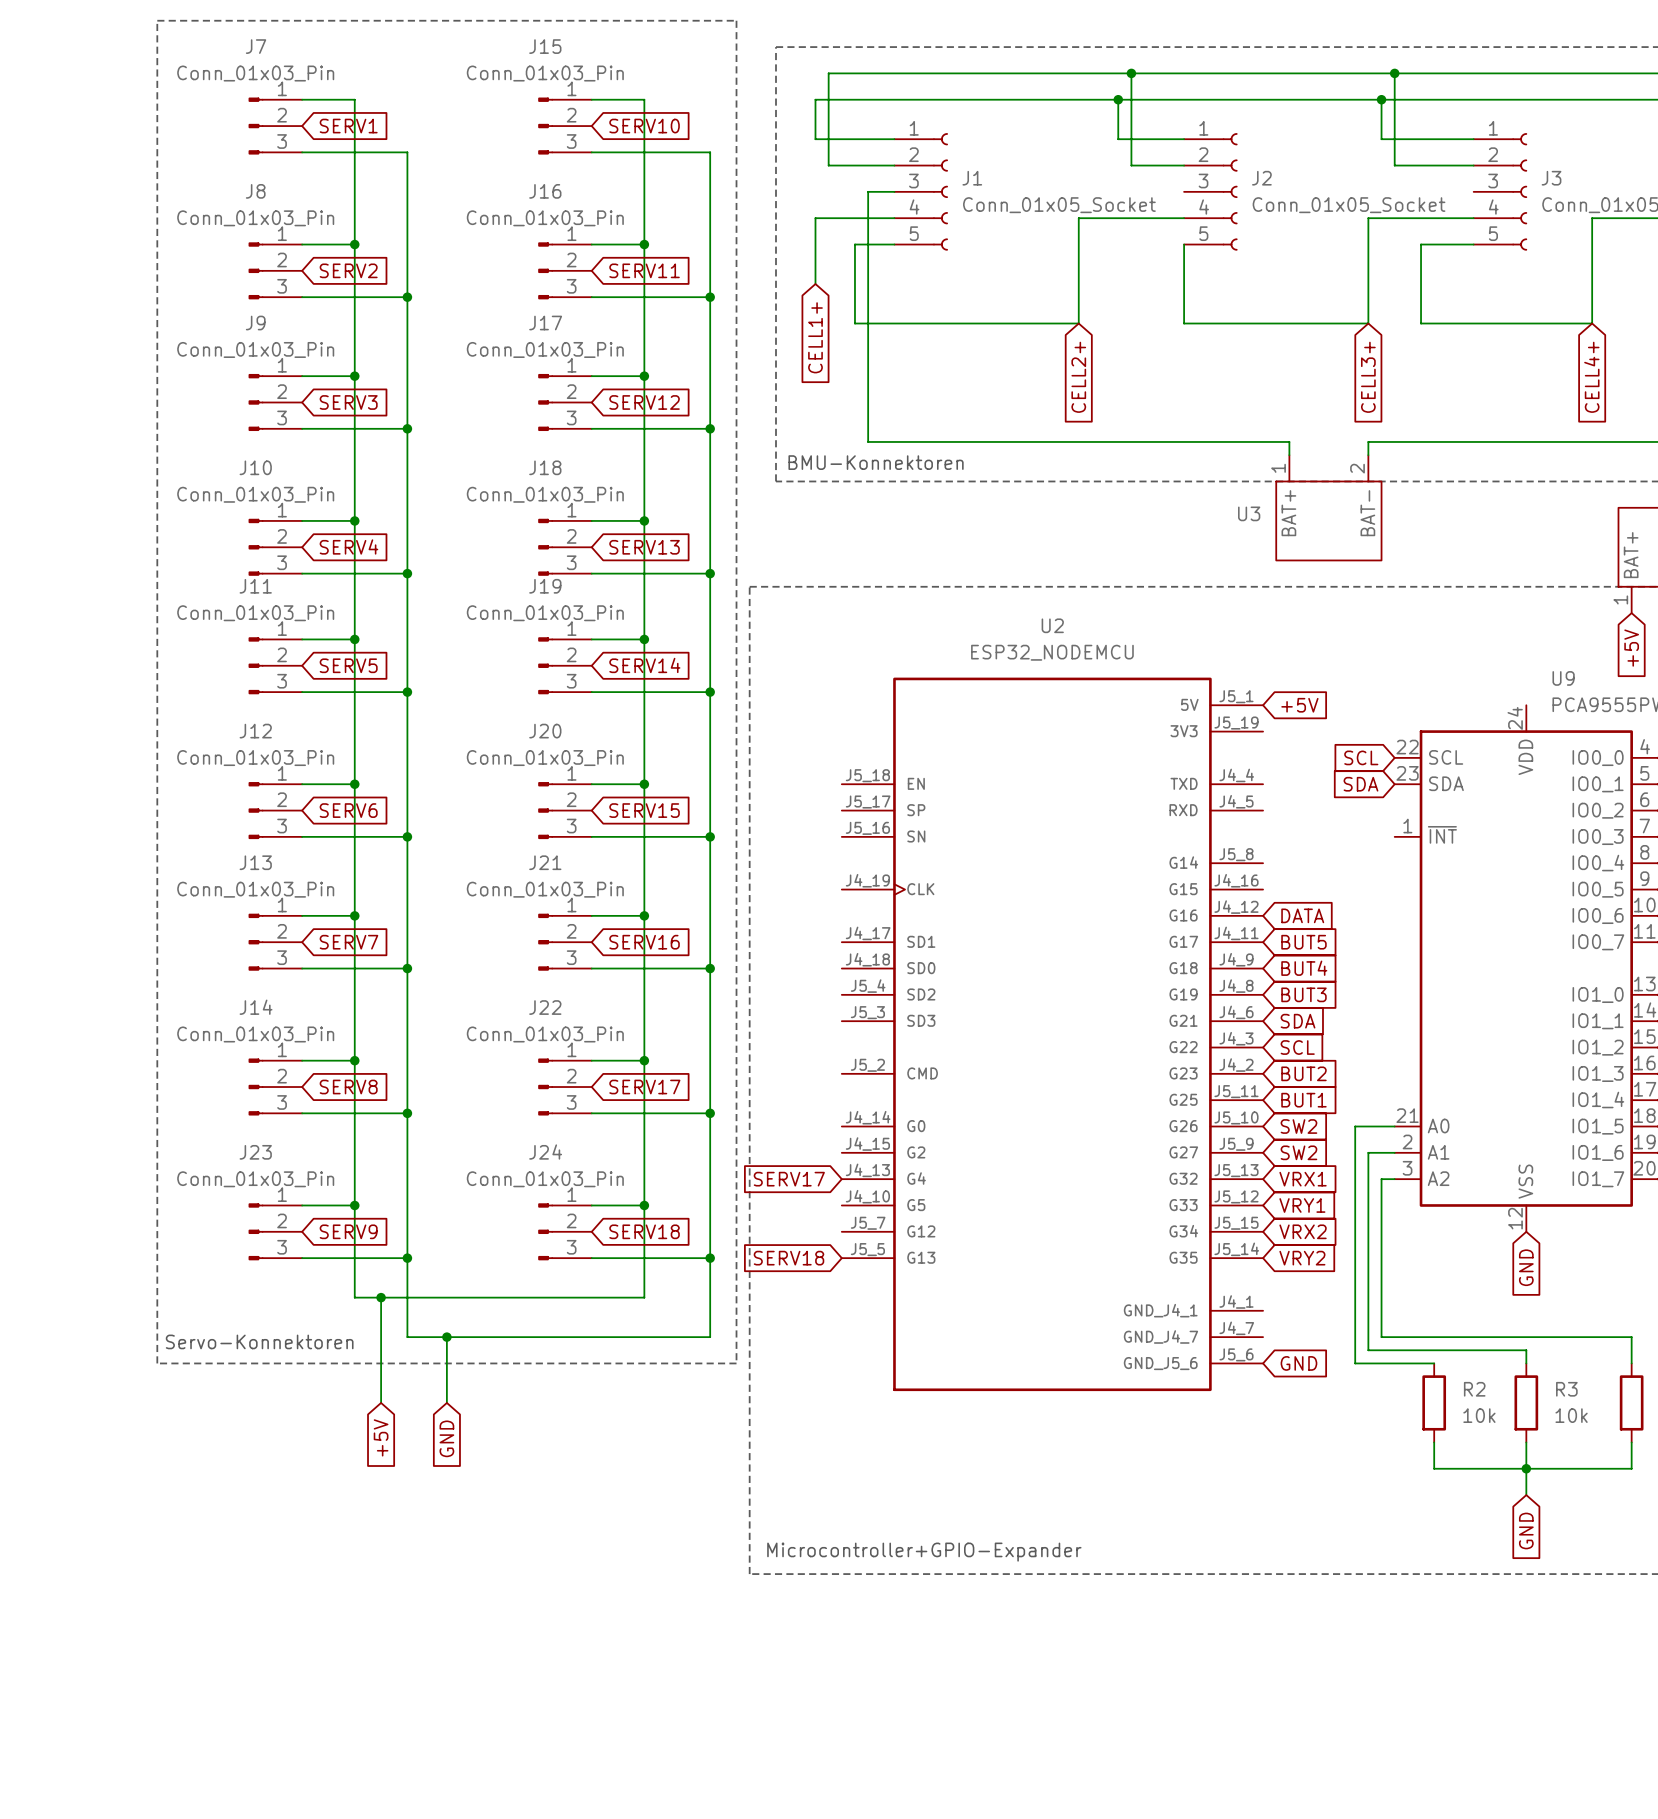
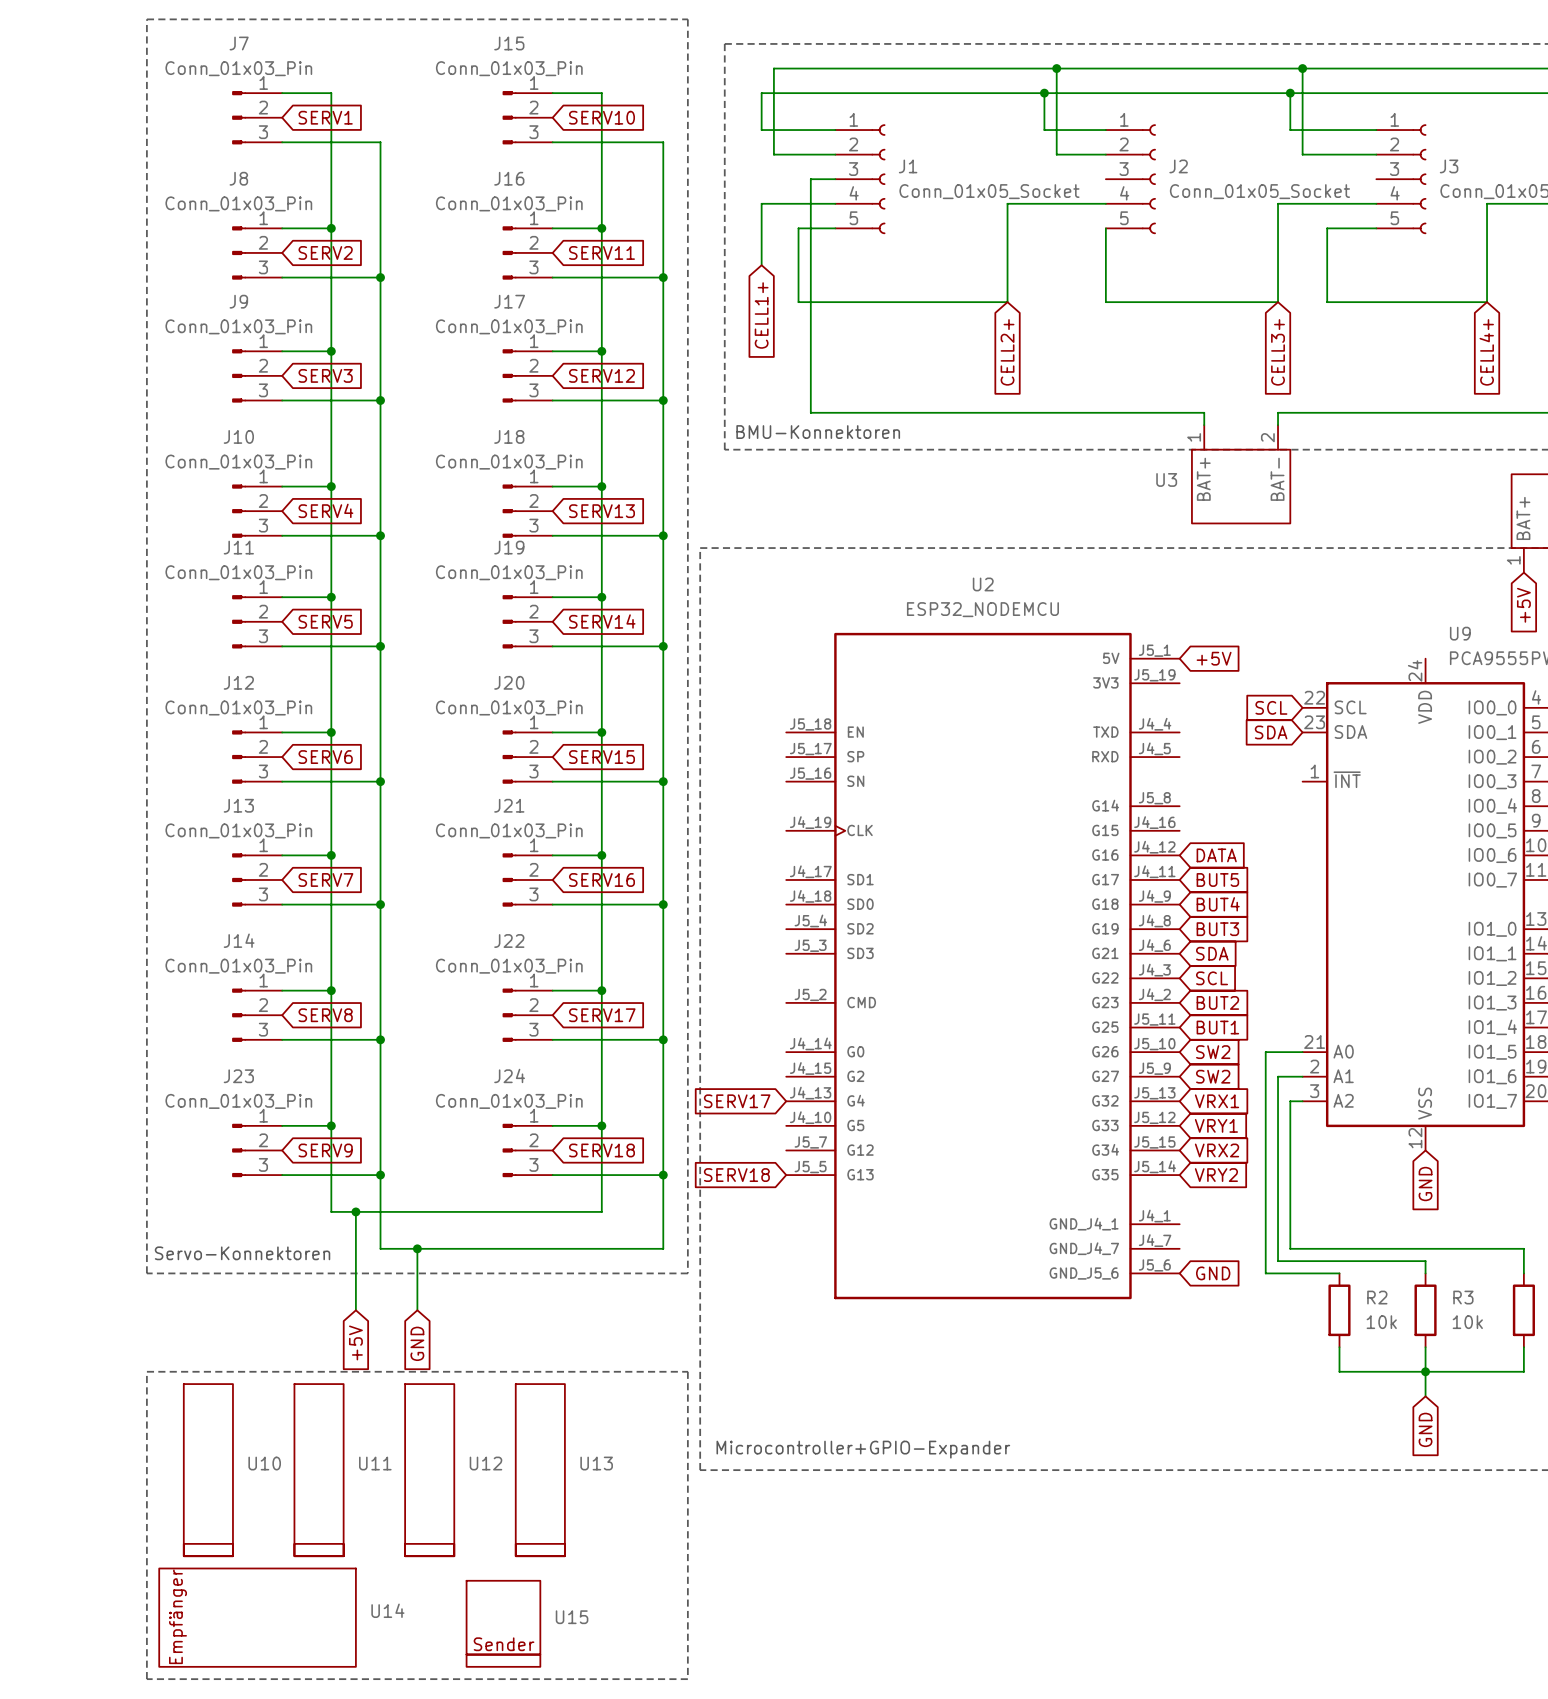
line: none -> (146, 1371) (687, 1371) (687, 1679) (146, 1679) (146, 1371)
U10: none -> (208, 1470)
U11: none -> (319, 1470)
U12: none -> (429, 1470)
U13: none -> (540, 1470)
U14: none -> (257, 1617)
U15: none -> (503, 1623)

